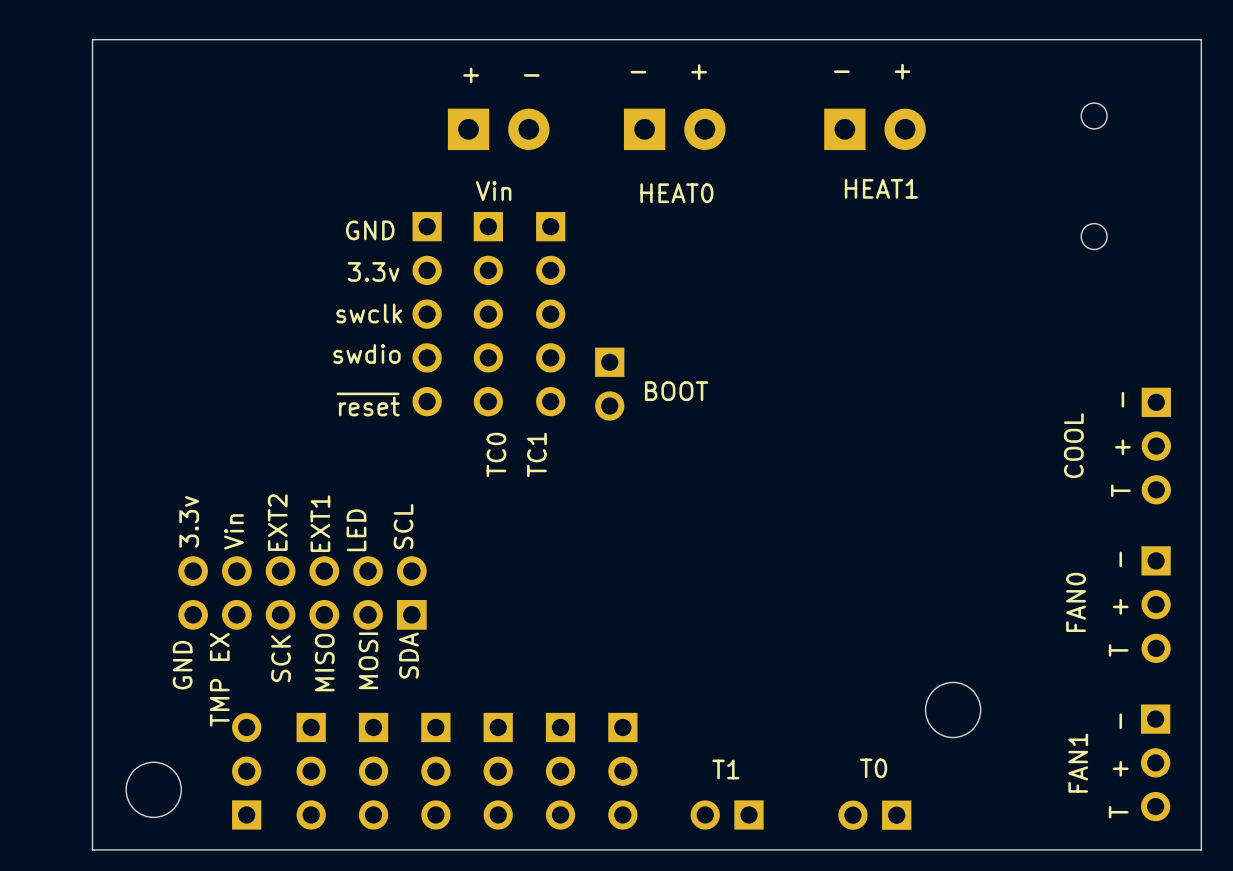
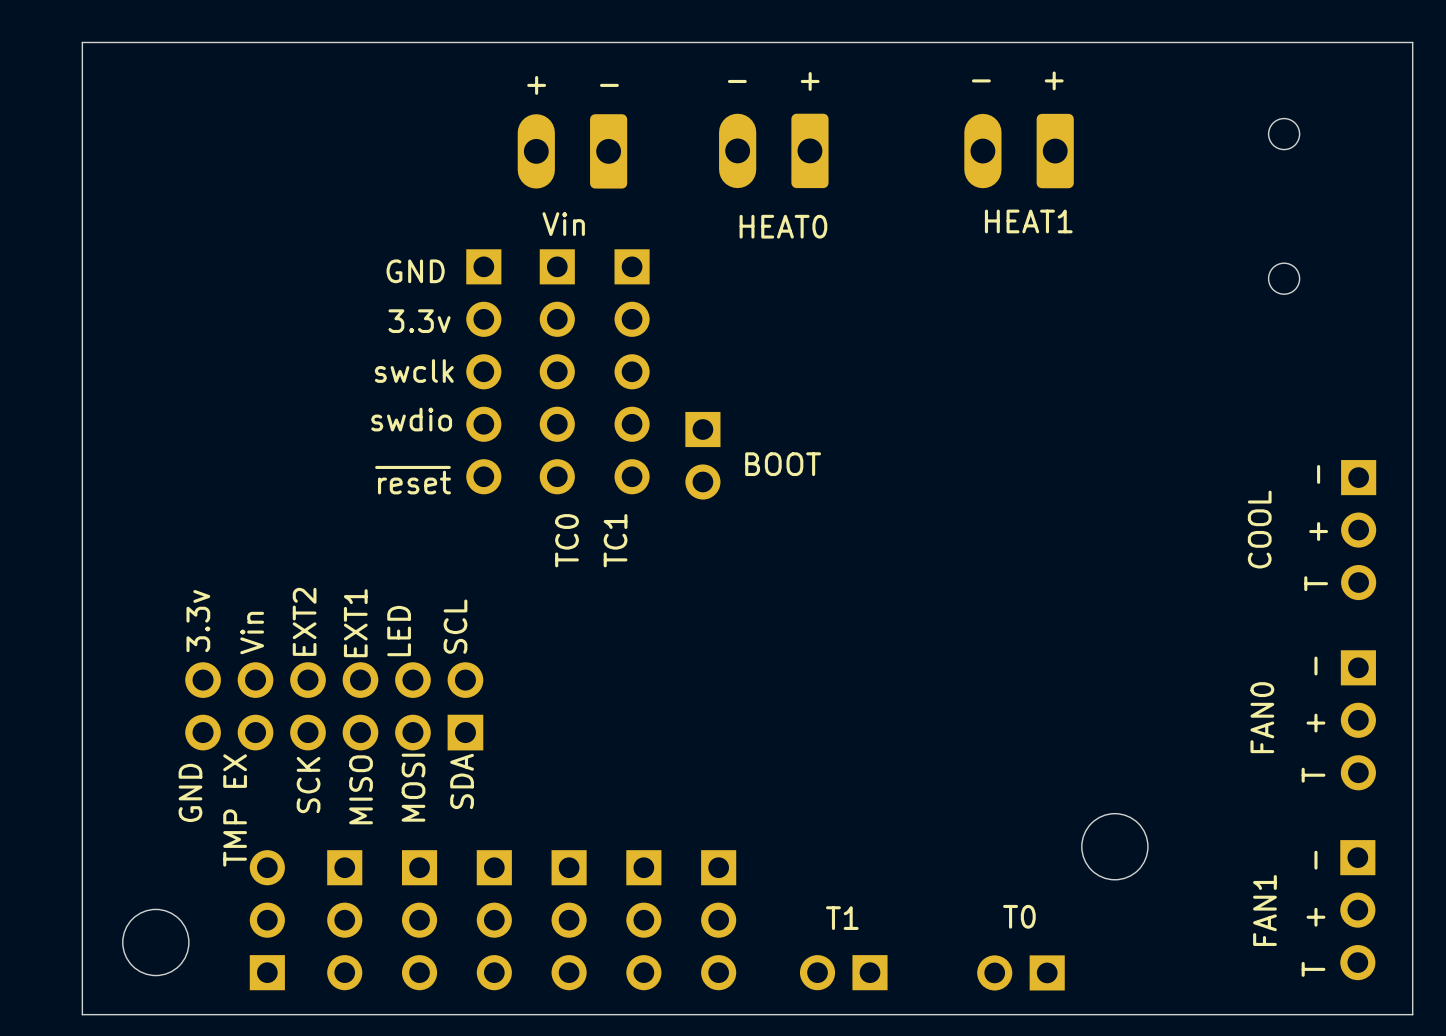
part footprint: [447, 108, 550, 151] -> [517, 114, 628, 189]
part footprint: [623, 108, 726, 151] -> [719, 113, 829, 189]
part footprint: [824, 108, 926, 151] -> [964, 113, 1074, 189]

